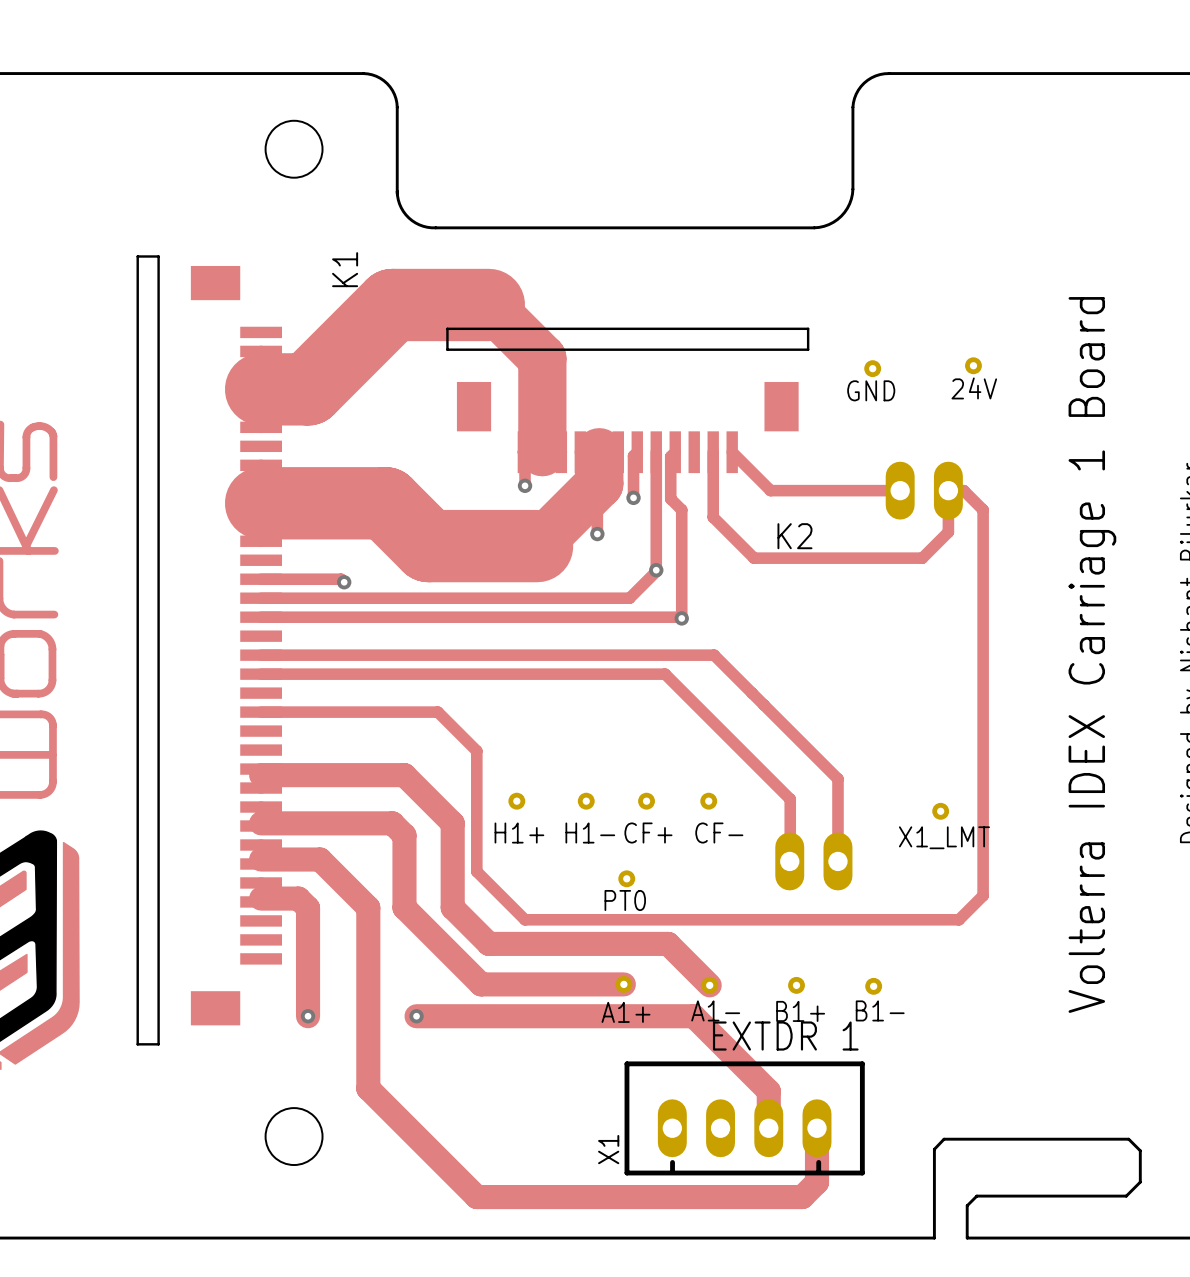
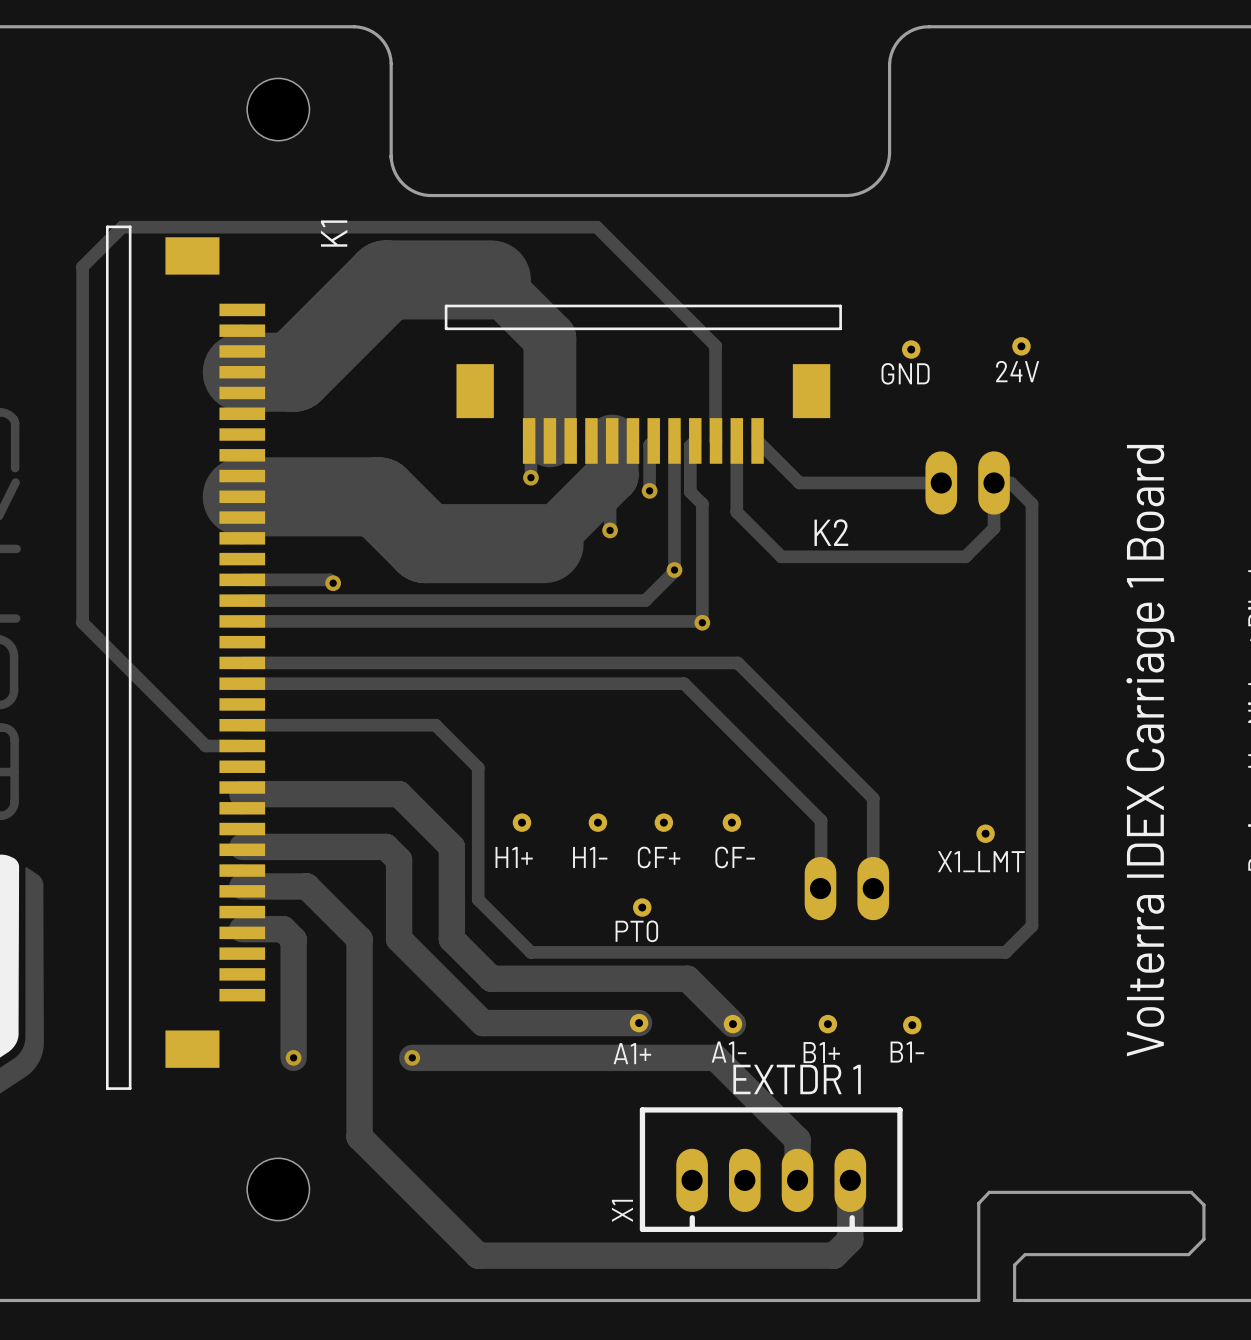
track: none -> (716, 440) (715, 345) (596, 227) (122, 227) (82, 266) (82, 622) (205, 745) (242, 745)

